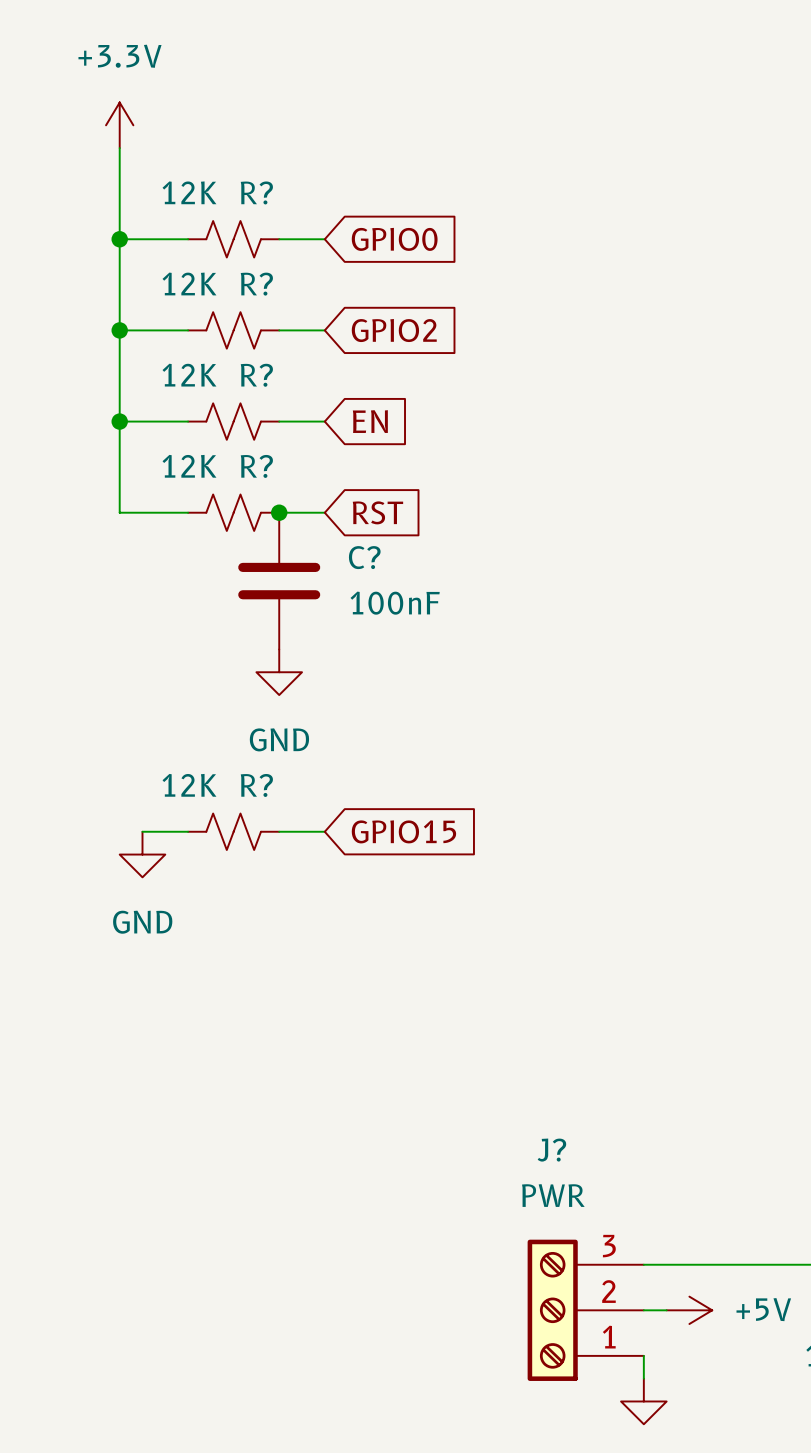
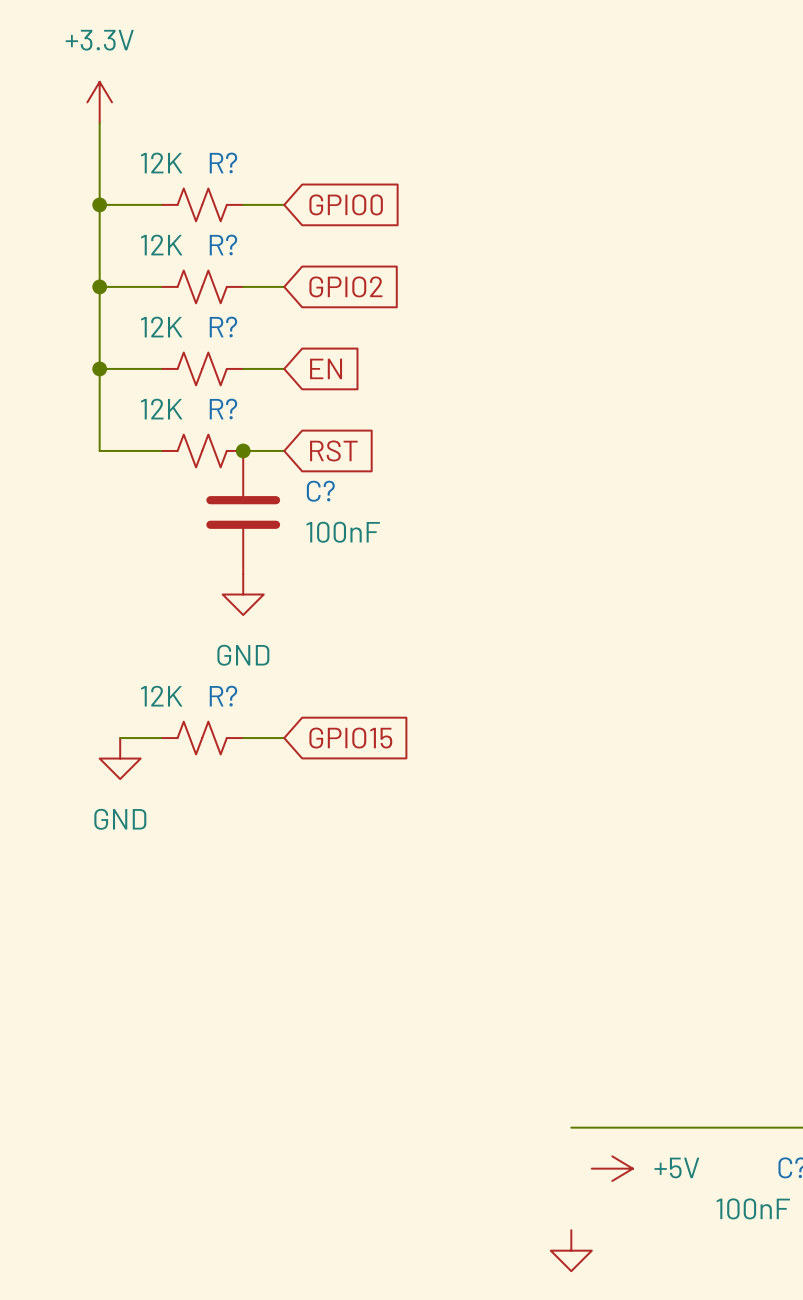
J?: PWR (585, 1310) -> none
wire: (643, 1310) (666, 1310) -> none
wire: (643, 1355) (643, 1378) -> none

